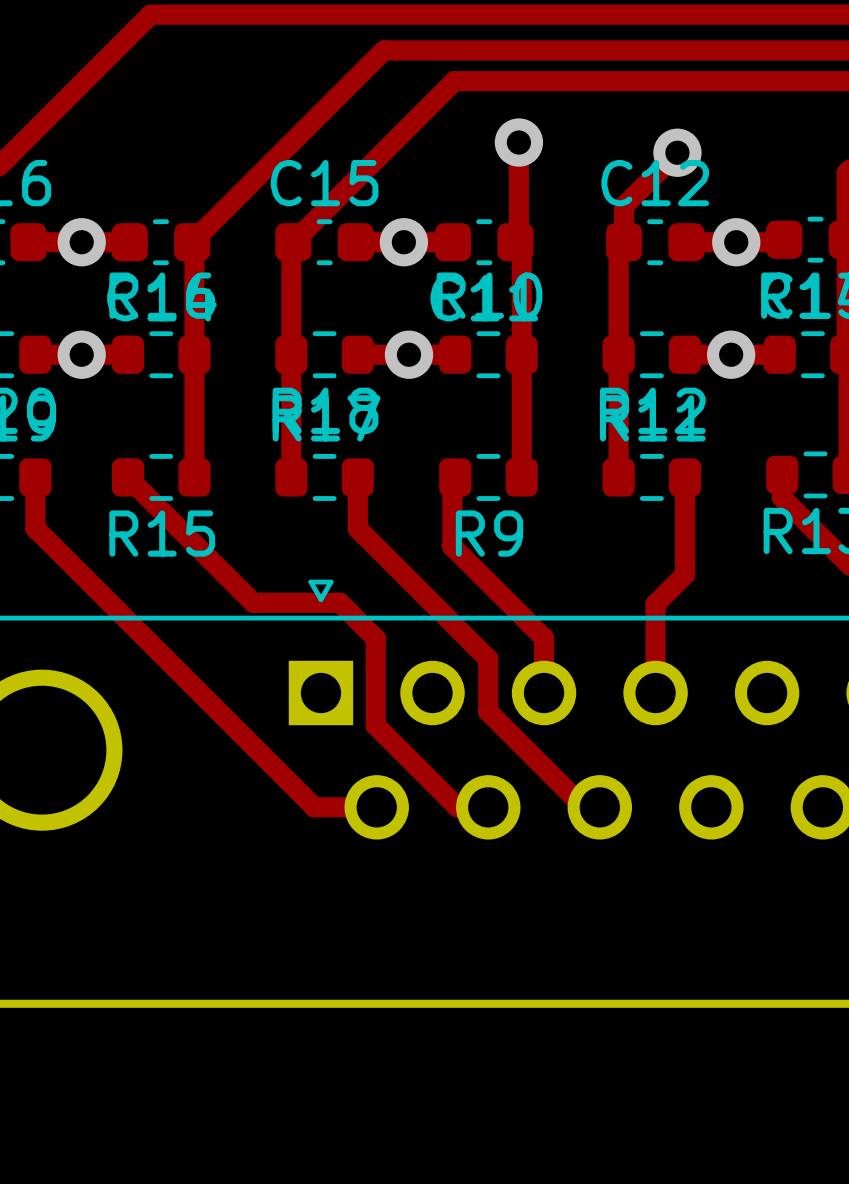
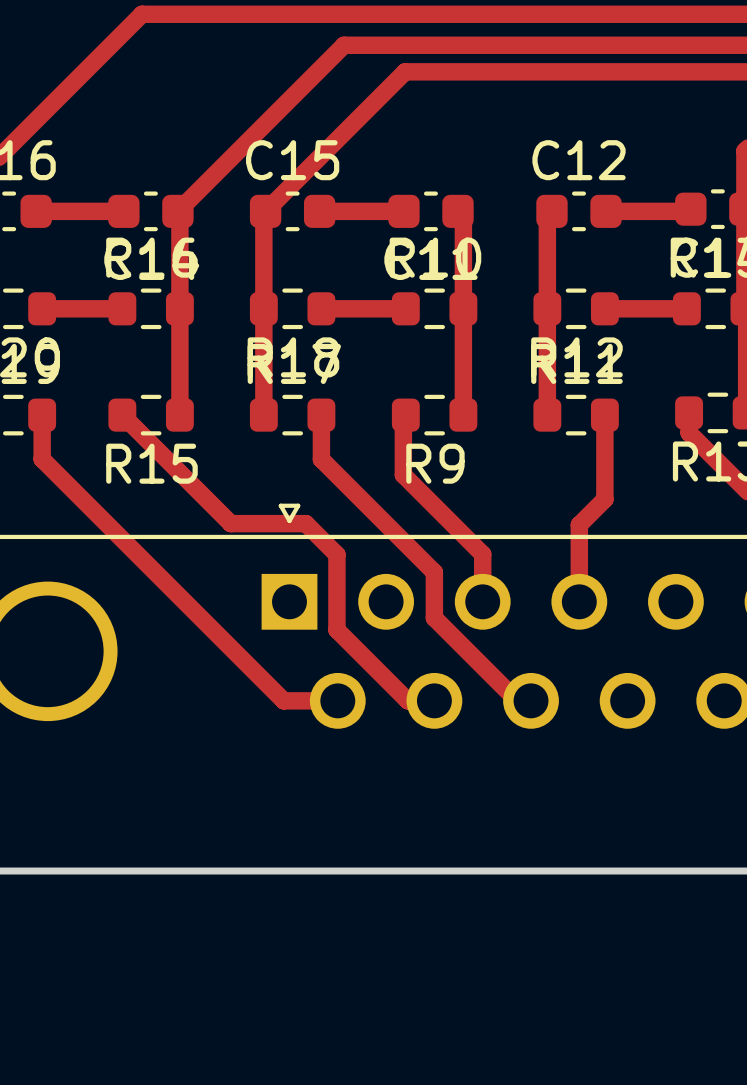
track: (518, 142) (518, 238) (515, 242) -> none
via: (518, 142) -> none
track: (677, 152) (624, 206) (624, 242) -> none
via: (677, 152) -> none
via: (81, 242) -> none
via: (403, 242) -> none
via: (736, 242) -> none
via: (81, 354) -> none
via: (408, 354) -> none
via: (731, 354) -> none

